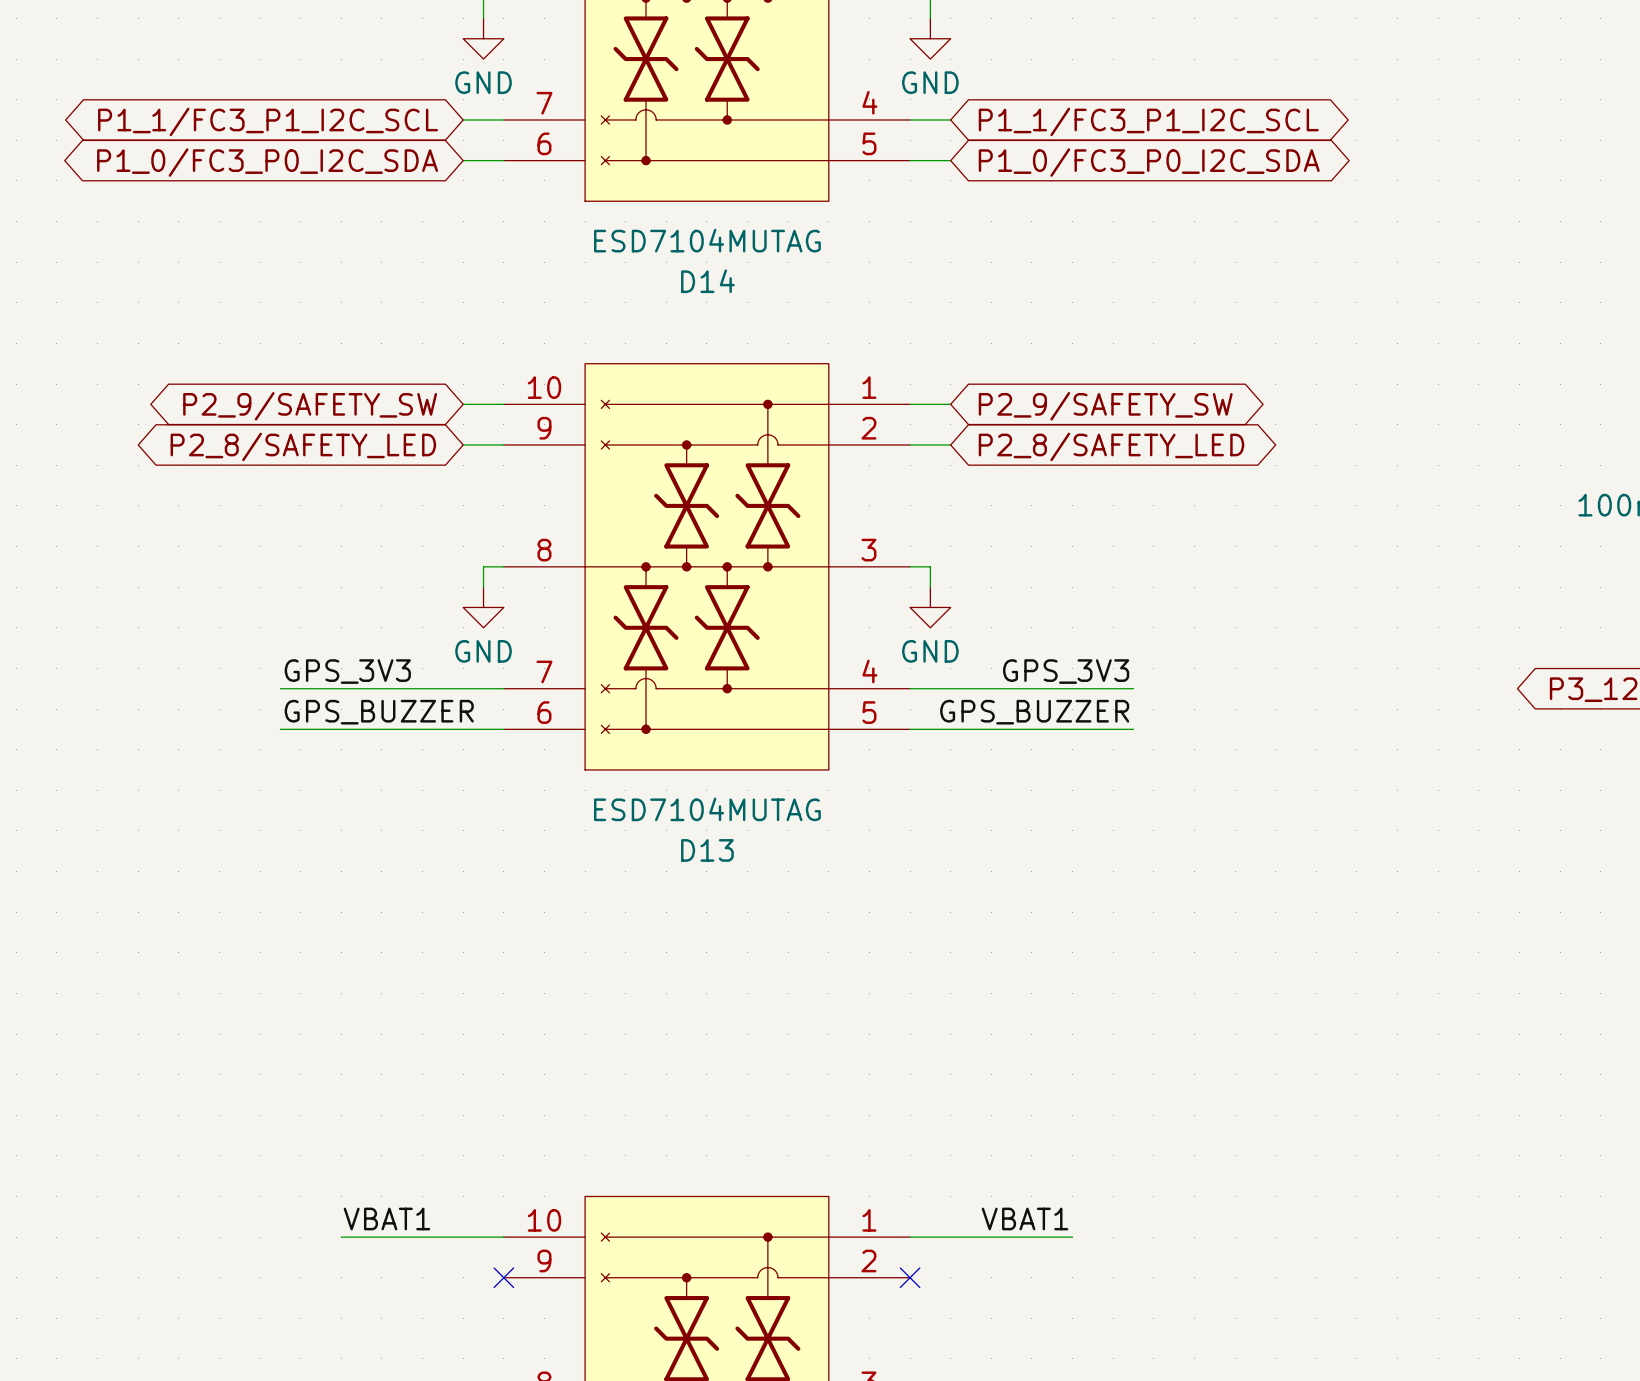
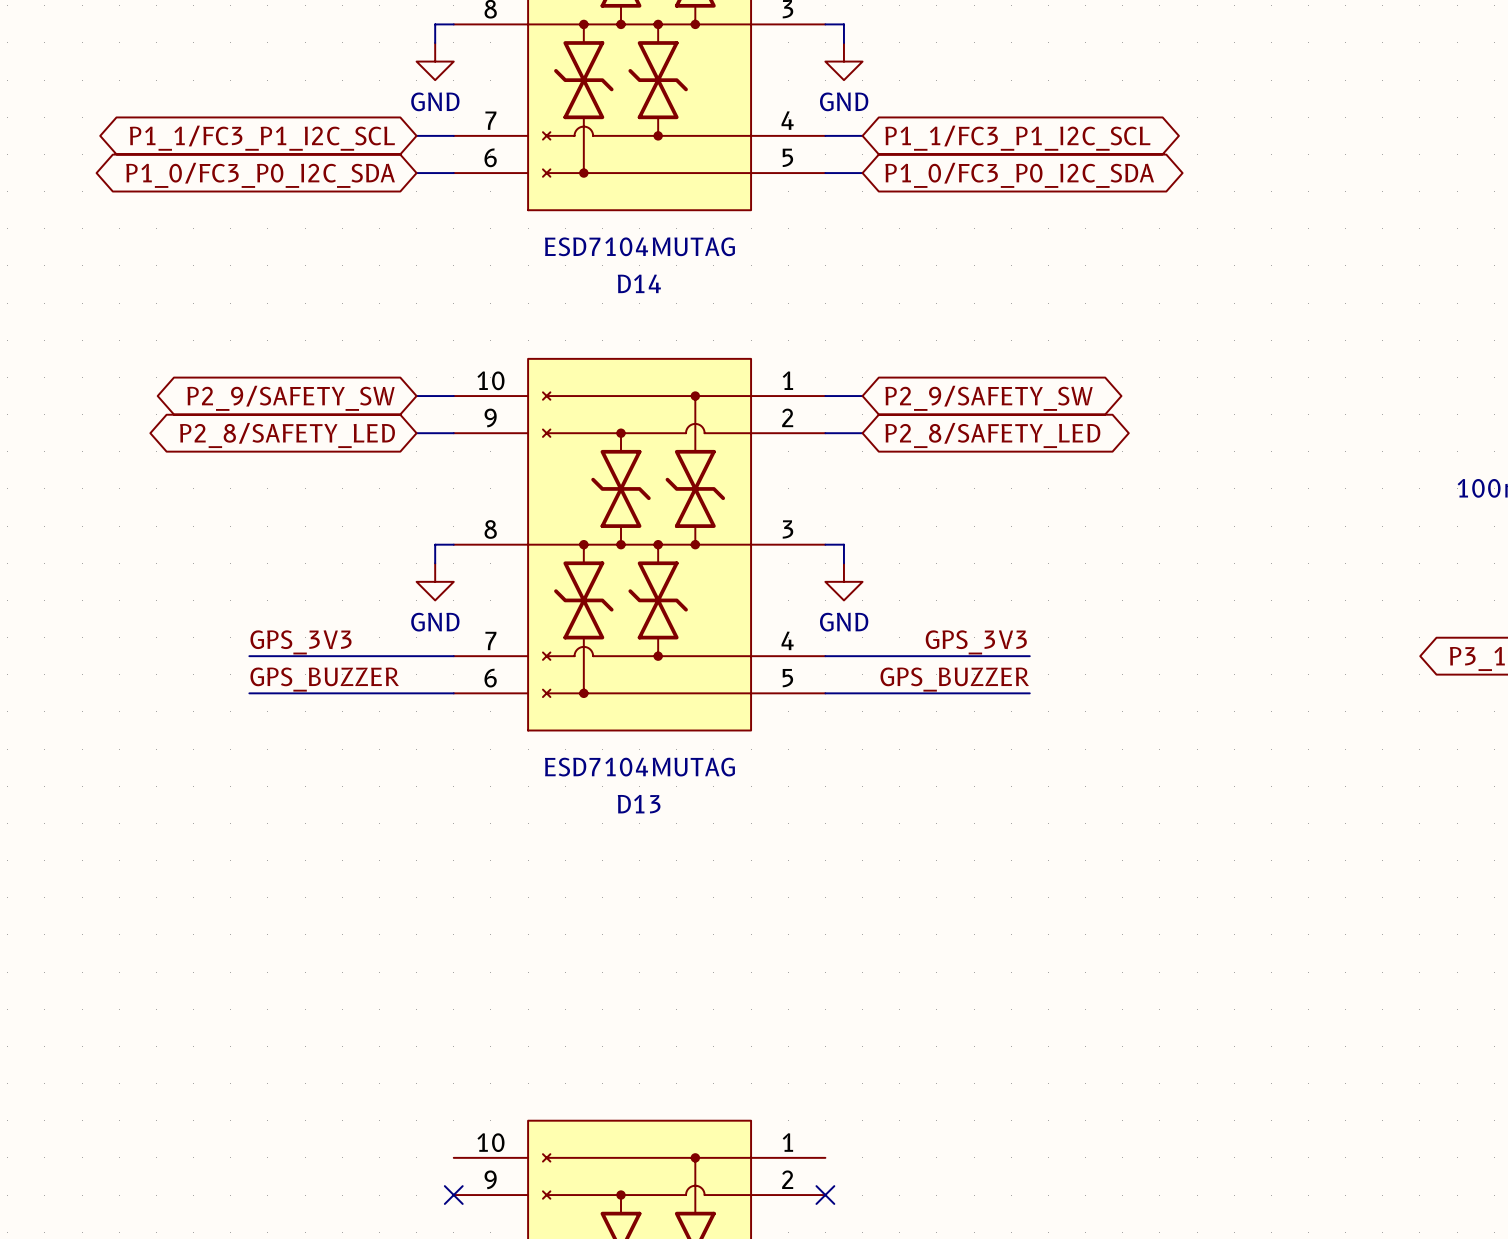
label: VBAT1 (386, 1218) -> none
label: VBAT1 (1025, 1218) -> none
wire: (341, 1237) (503, 1237) -> none
wire: (910, 1237) (1072, 1237) -> none

